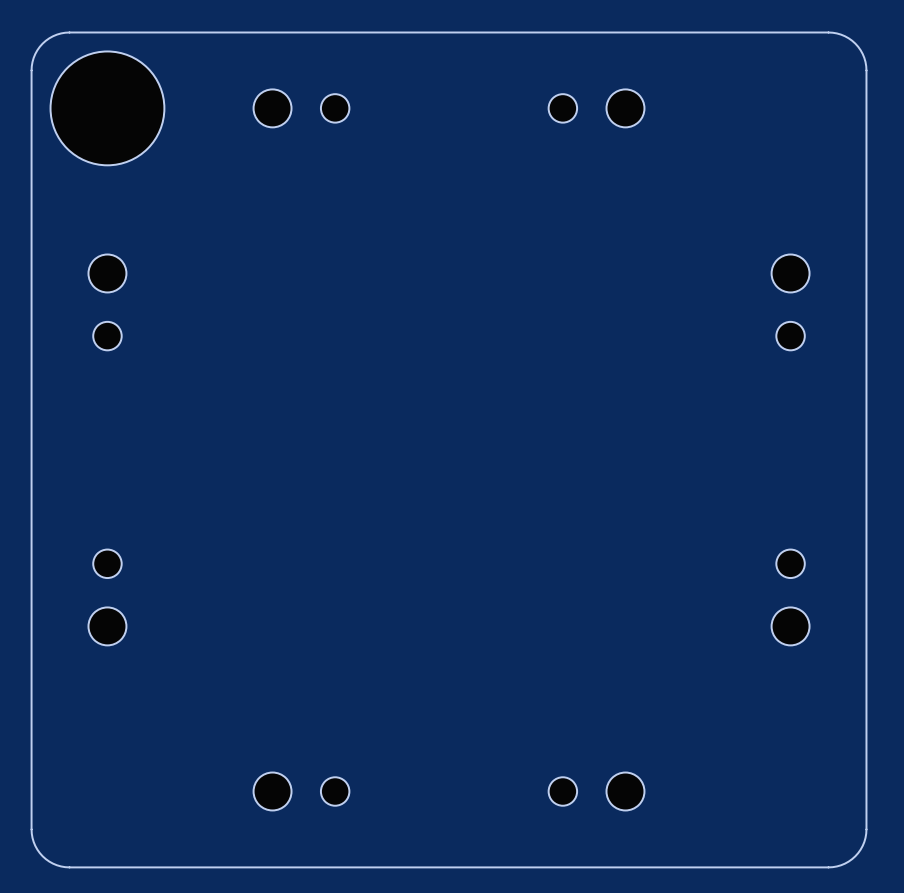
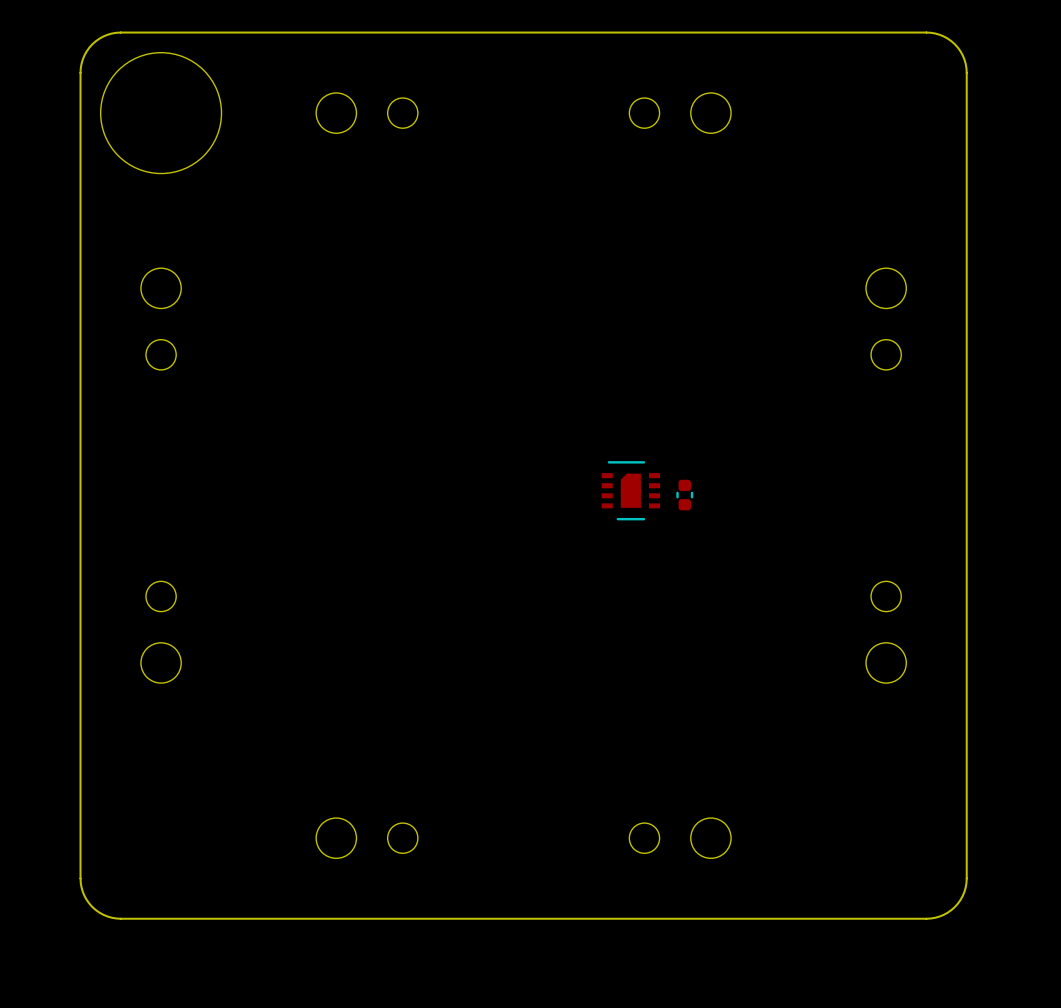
part: none -> (630, 490)
part: none -> (684, 495)

